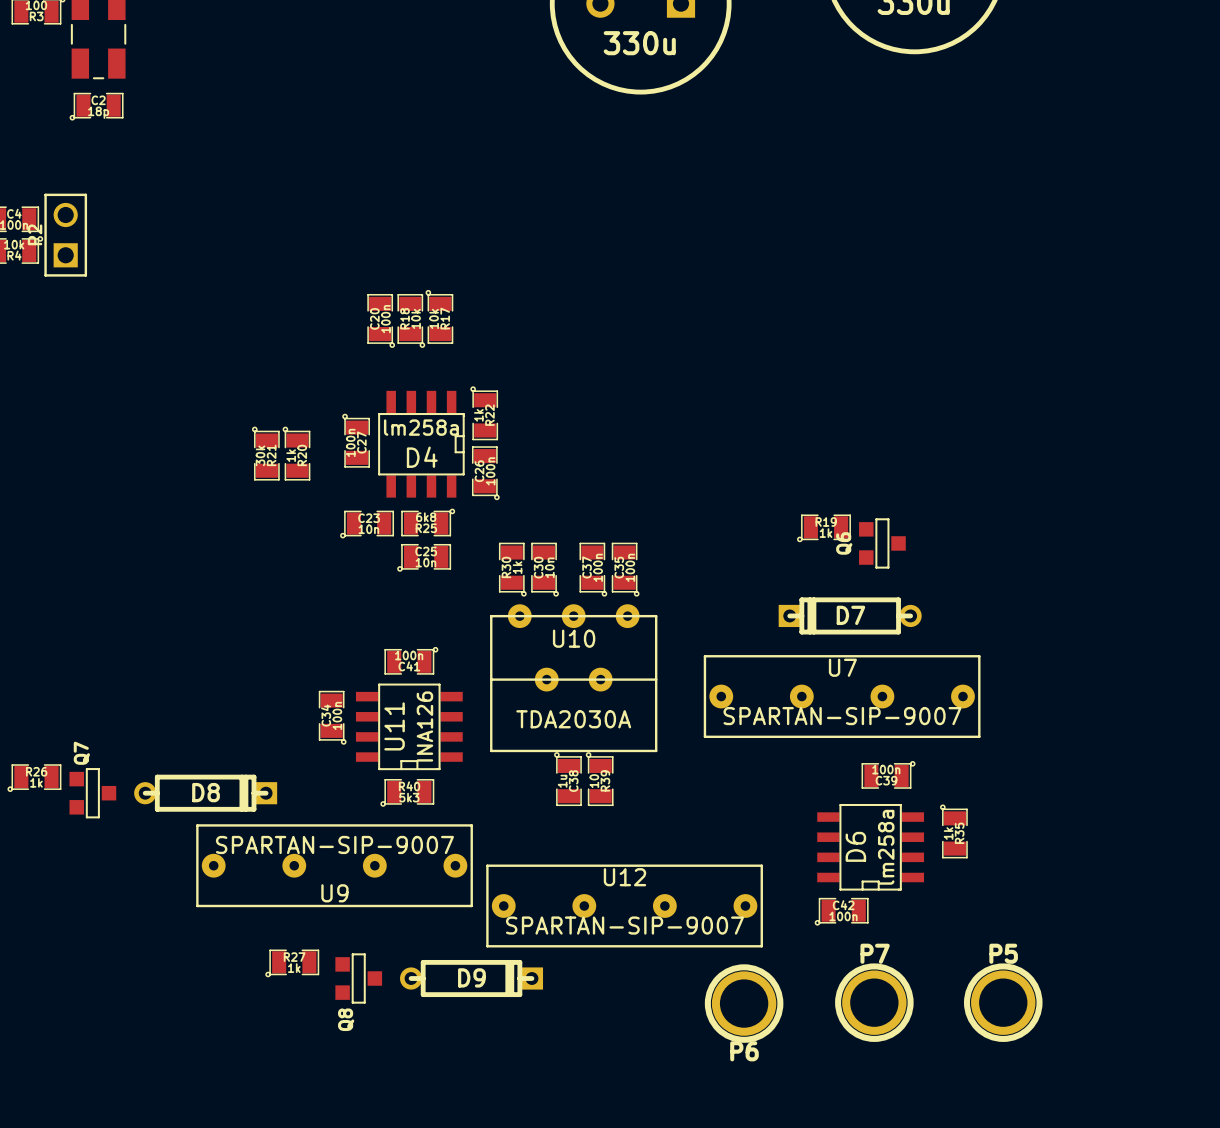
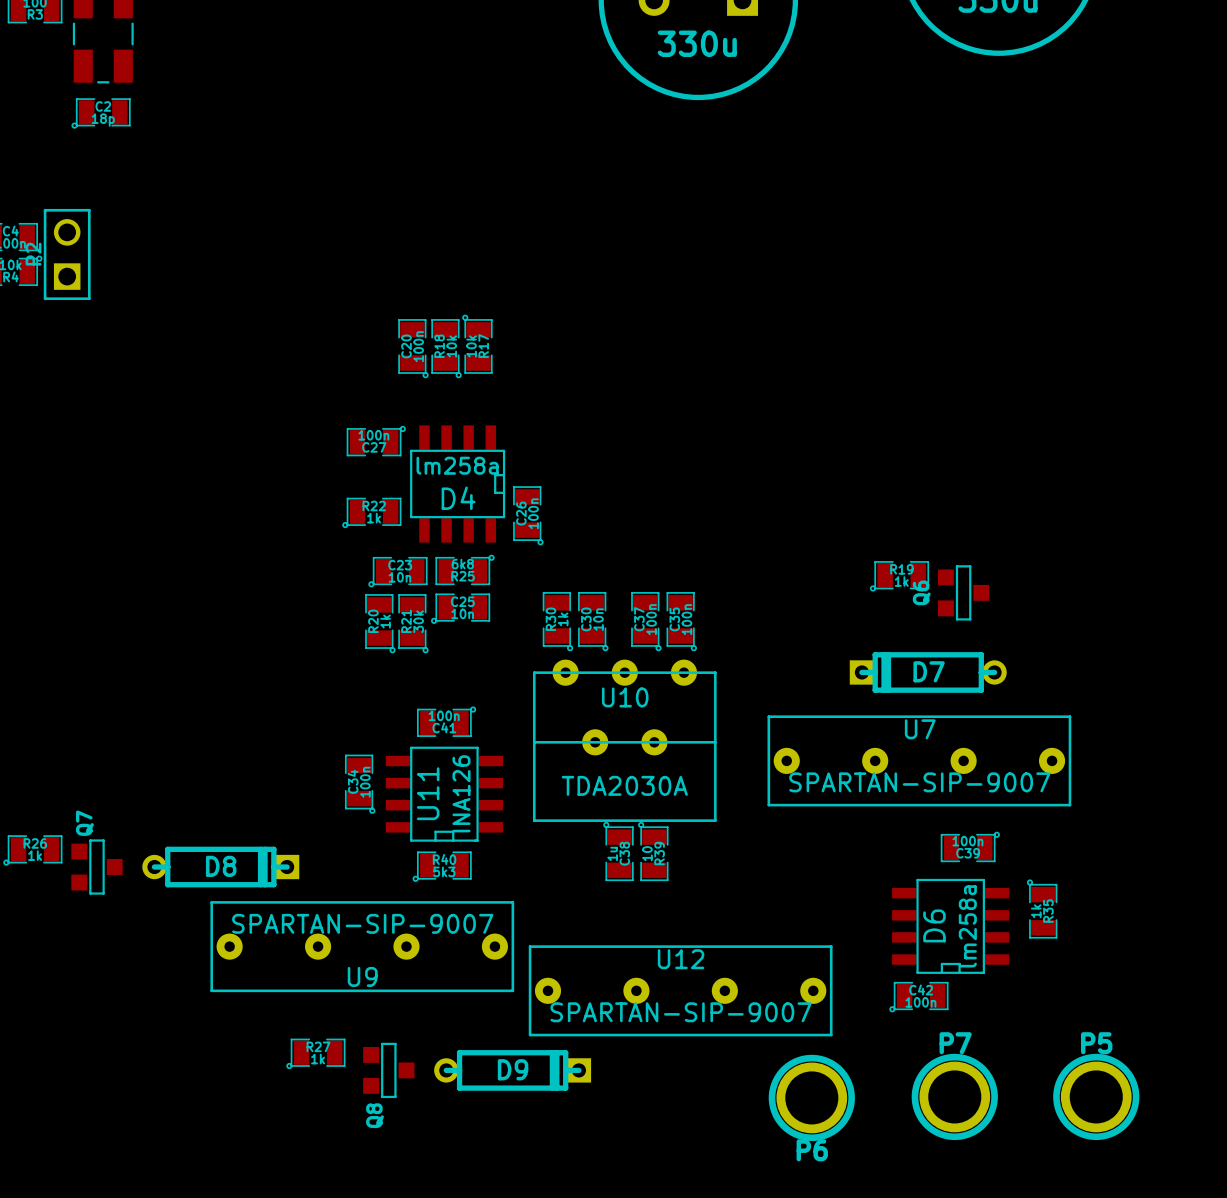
R22 rotation: 0° (484, 413) -> 90° counterclockwise (371, 512)
R22 position: (484, 413) -> (371, 512)
C27 rotation: 0° (356, 440) -> 90° clockwise (376, 441)
C27 position: (356, 440) -> (376, 441)
R21 rotation: 0° (265, 453) -> 180° (413, 623)
R21 position: (265, 453) -> (413, 623)
R20 rotation: 0° (296, 453) -> 180° (380, 623)
R20 position: (296, 453) -> (380, 623)

